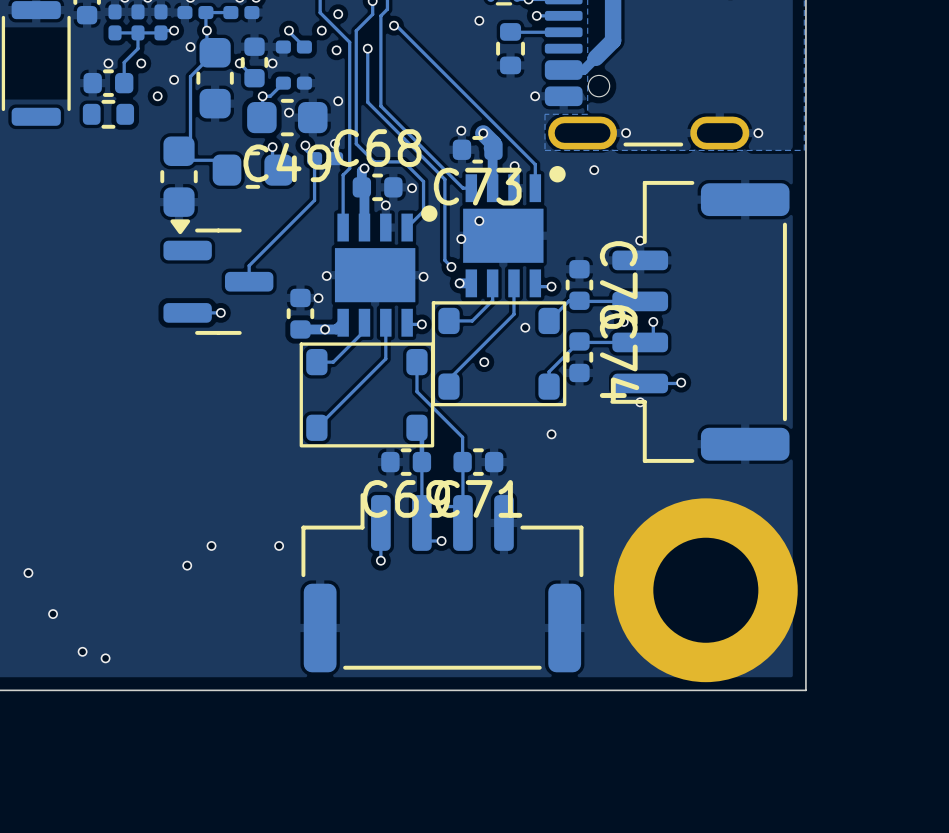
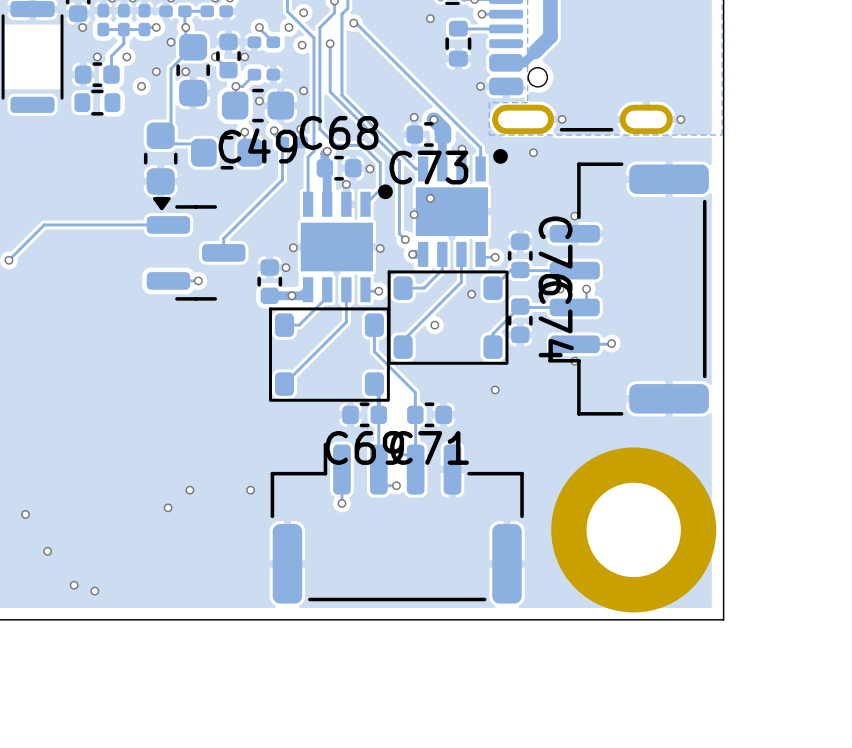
via: none -> (82, 27)
via: none -> (185, 71)
track: none -> (168, 224) (44, 224) (8, 260)
via: none -> (8, 260)

